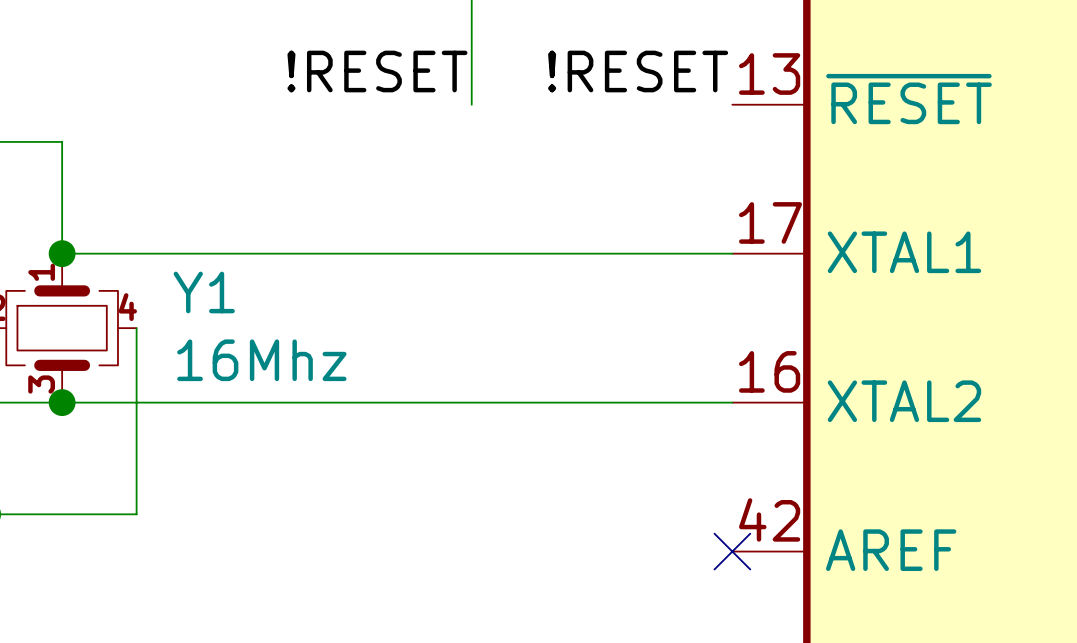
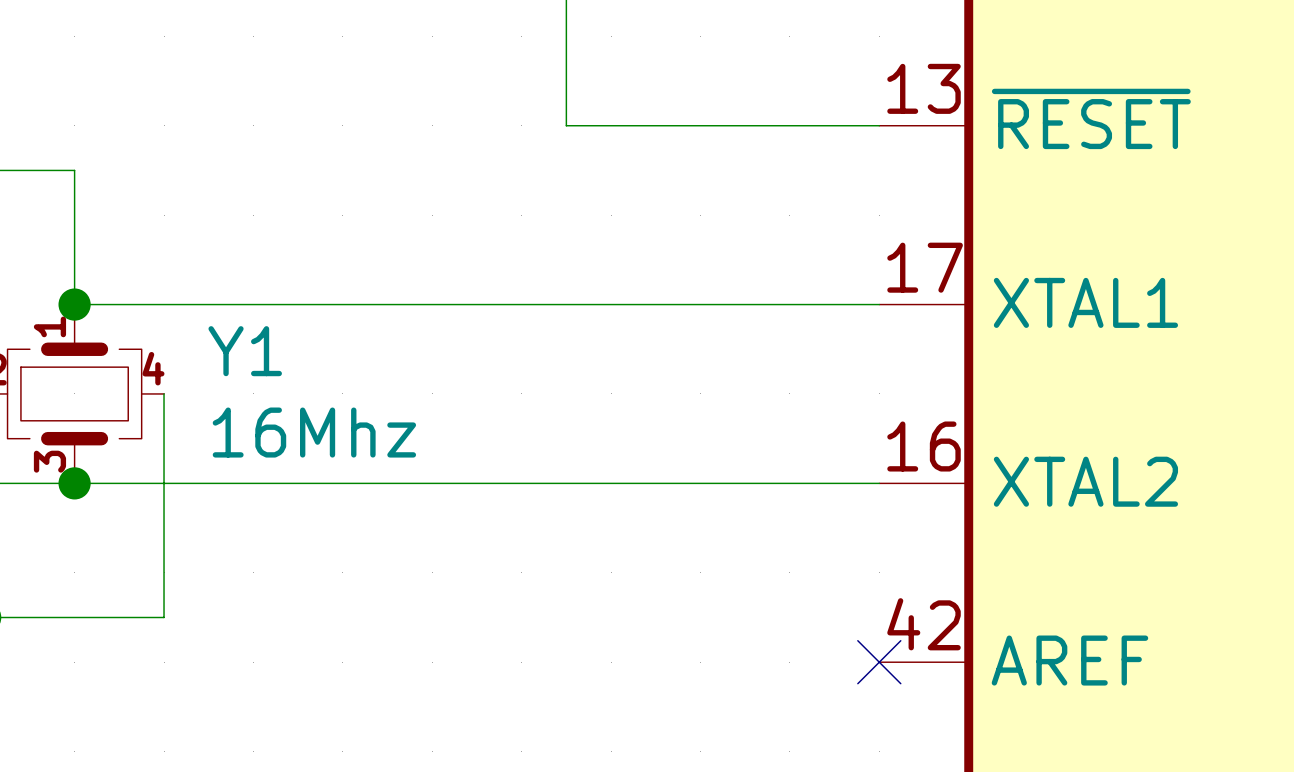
label: !RESET (377, 71) -> none
label: !RESET (638, 71) -> none
wire: none -> (566, 125) (879, 125)

